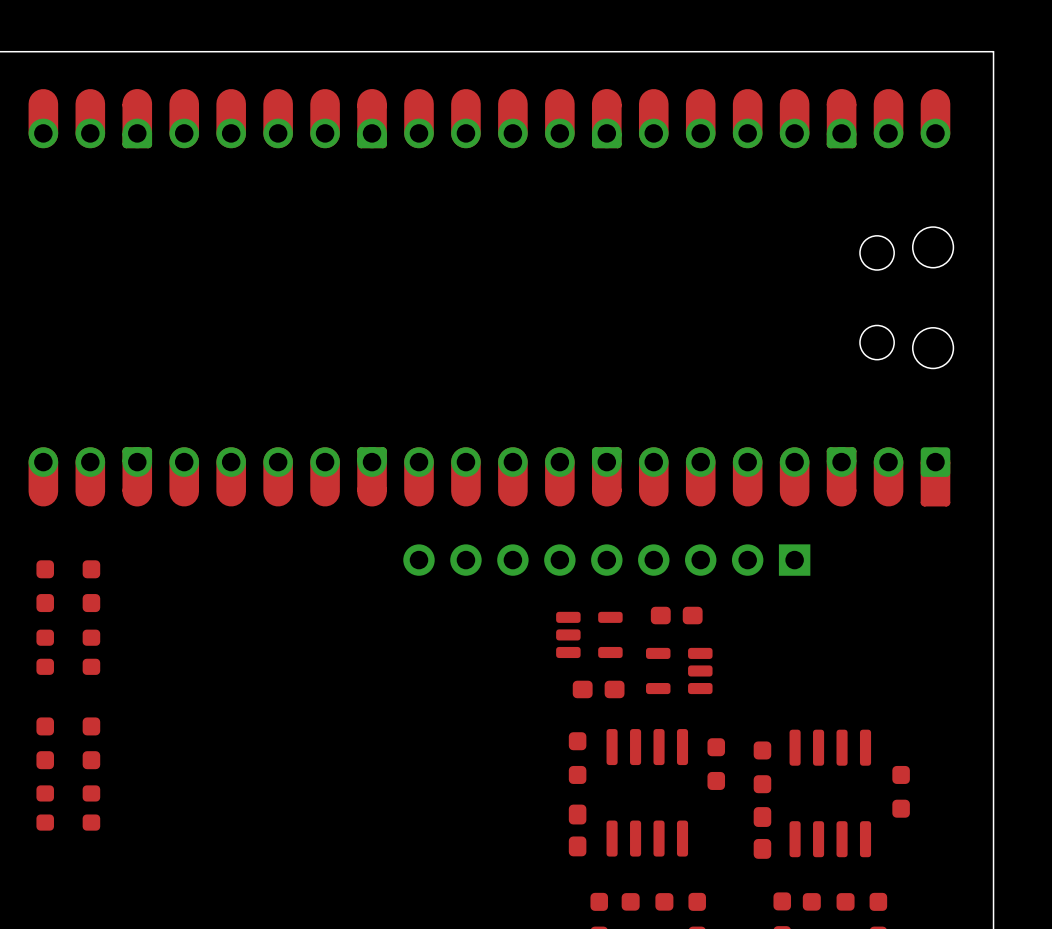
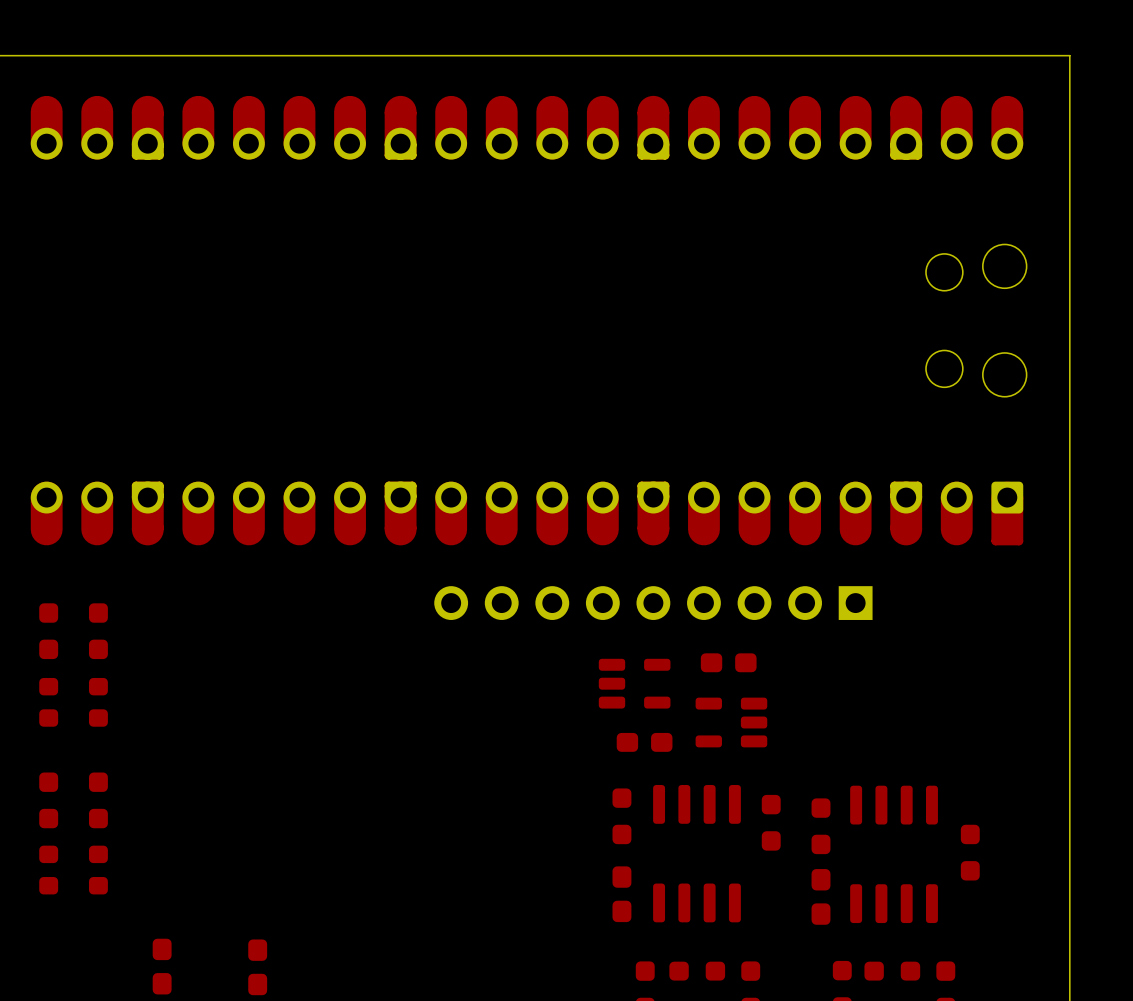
part: none -> (162, 966)
part: none -> (257, 967)

